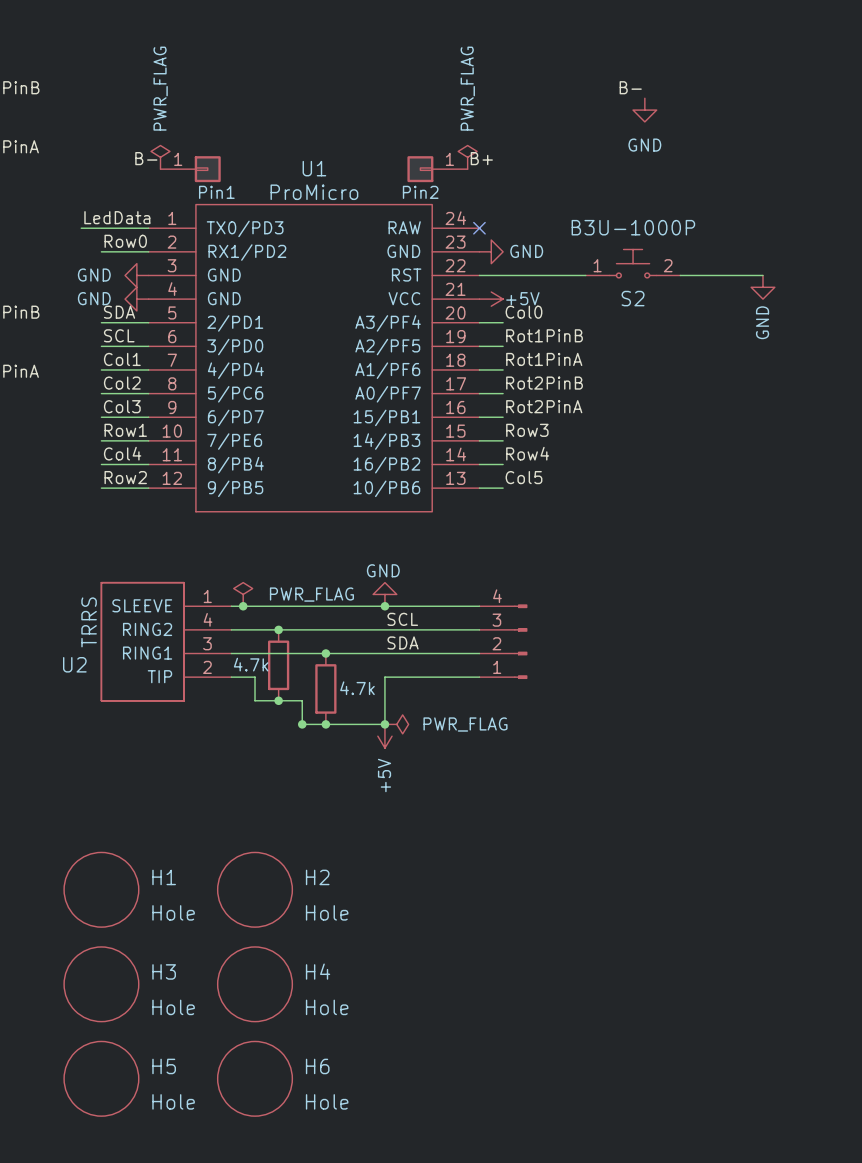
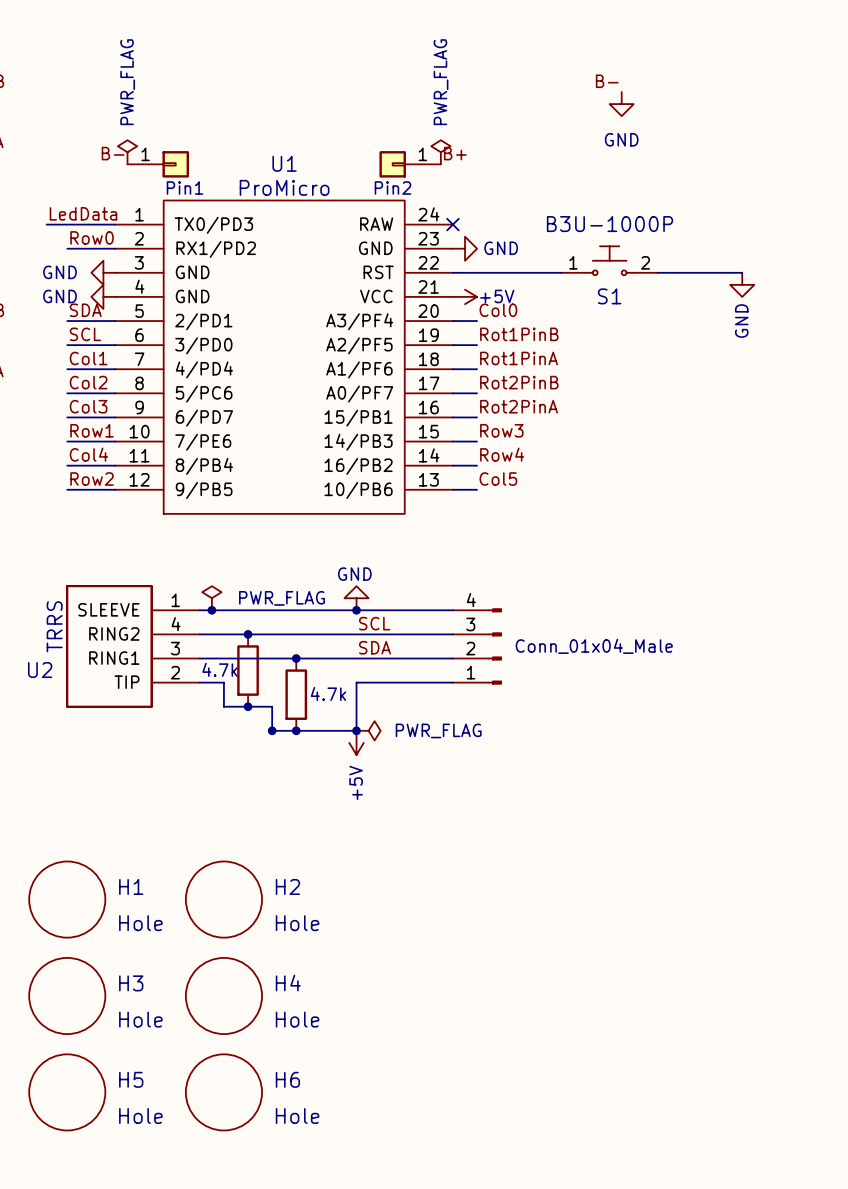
S2 name: S2 (633, 298) -> S1 (609, 296)
part value: none -> Conn_01x04_Male (594, 646)

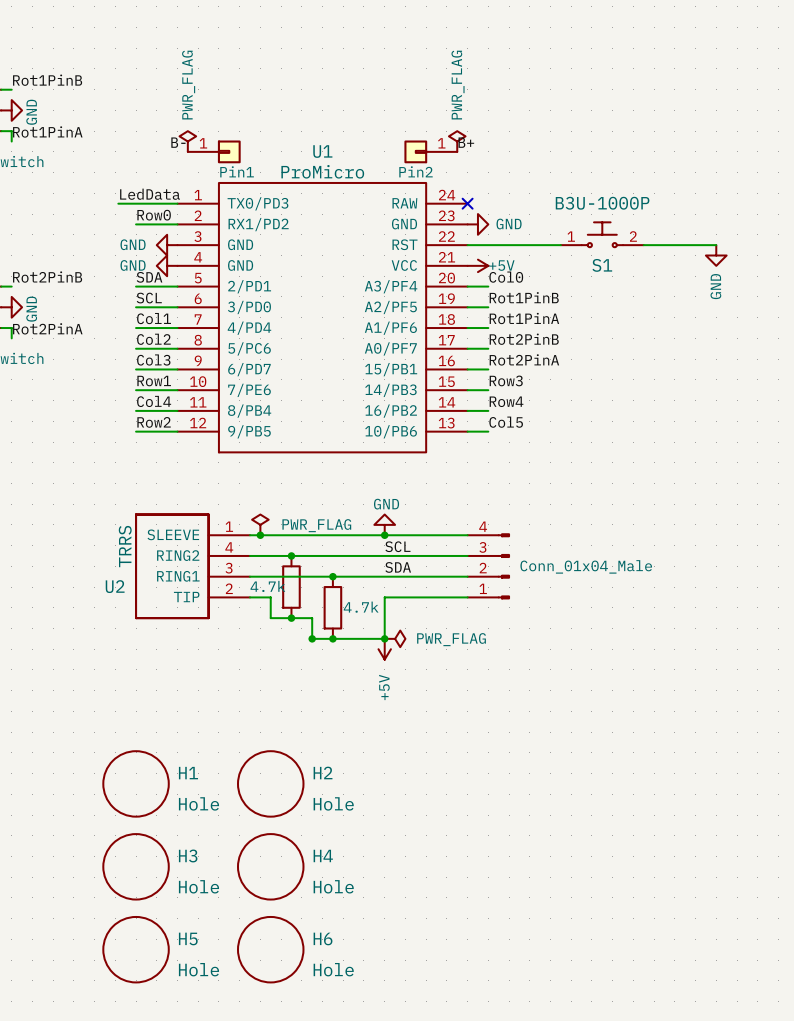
label: B- (607, 81) -> none
power symbol: GND (621, 104) -> none

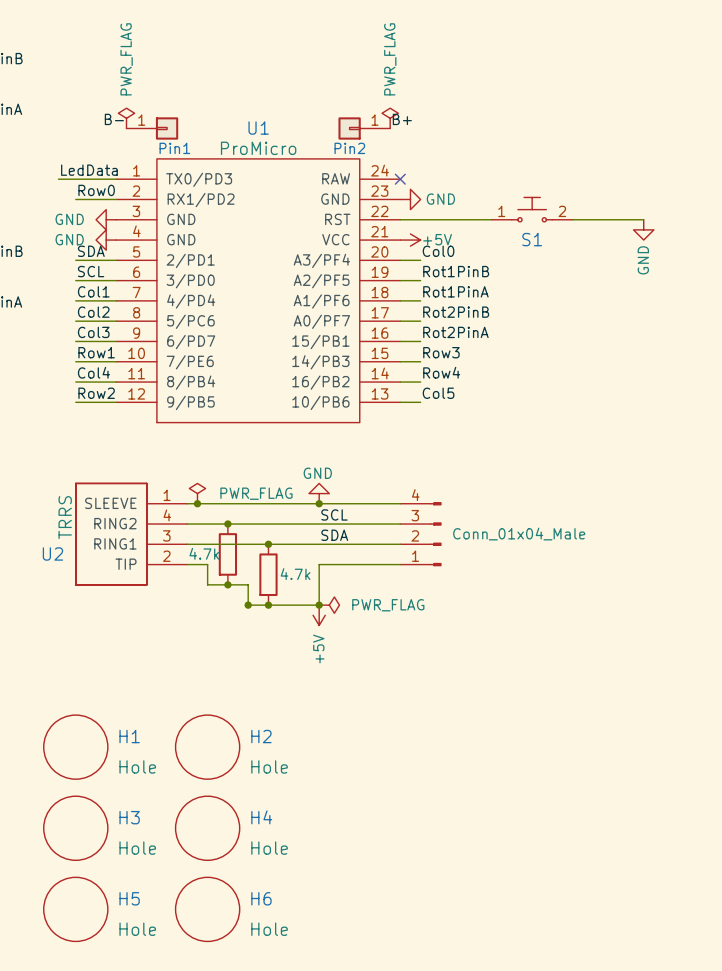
S1 value: B3U-1000P (602, 203) -> none

